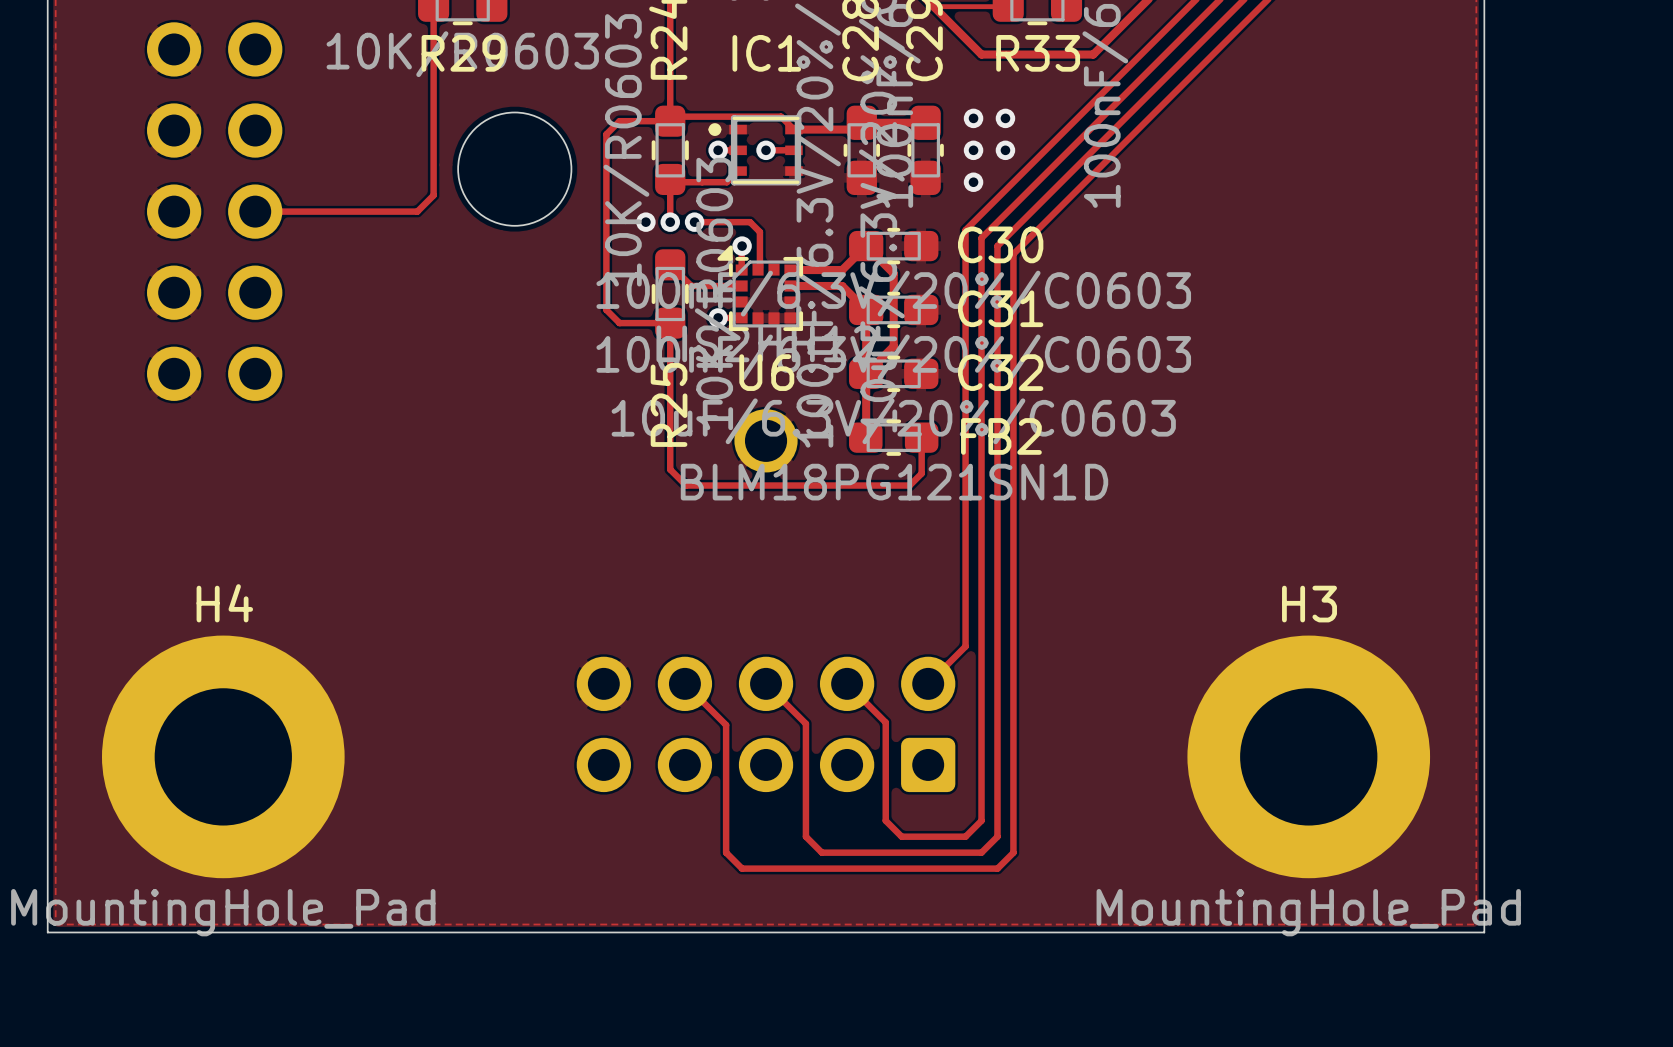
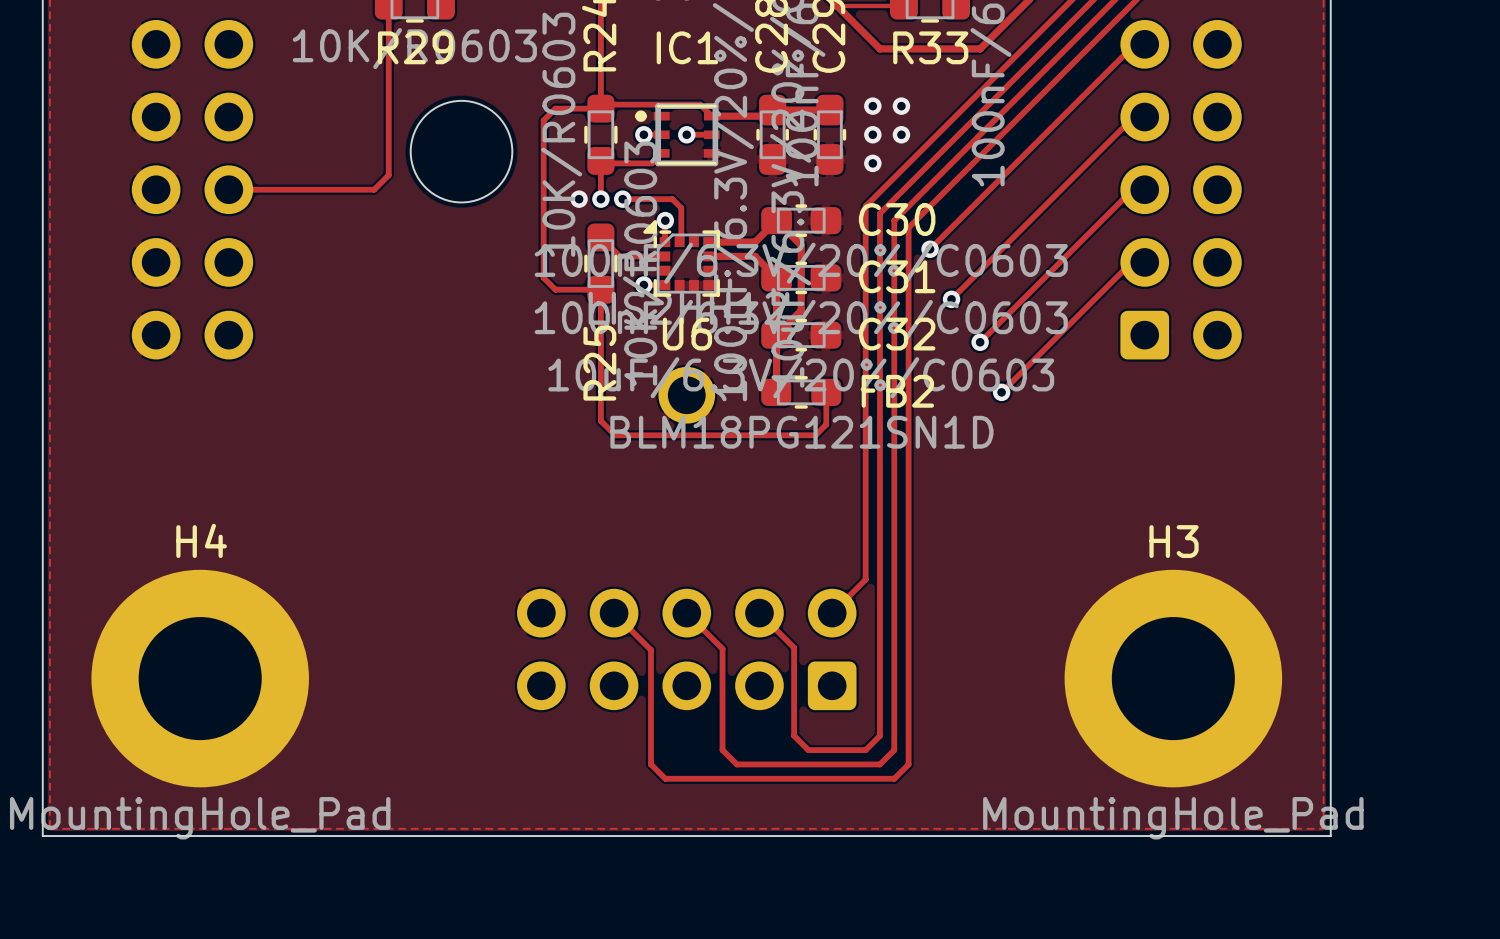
track: none -> (1144, 44) (1135, 44) (930, 249)
track: none -> (1144, 117) (1133, 117) (951, 299)
track: none -> (1144, 189) (1132, 189) (980, 342)
part: none -> (1181, 189)
via: none -> (930, 249)
track: none -> (1144, 262) (1131, 262) (1001, 392)
via: none -> (951, 299)
via: none -> (980, 342)
via: none -> (1001, 392)

